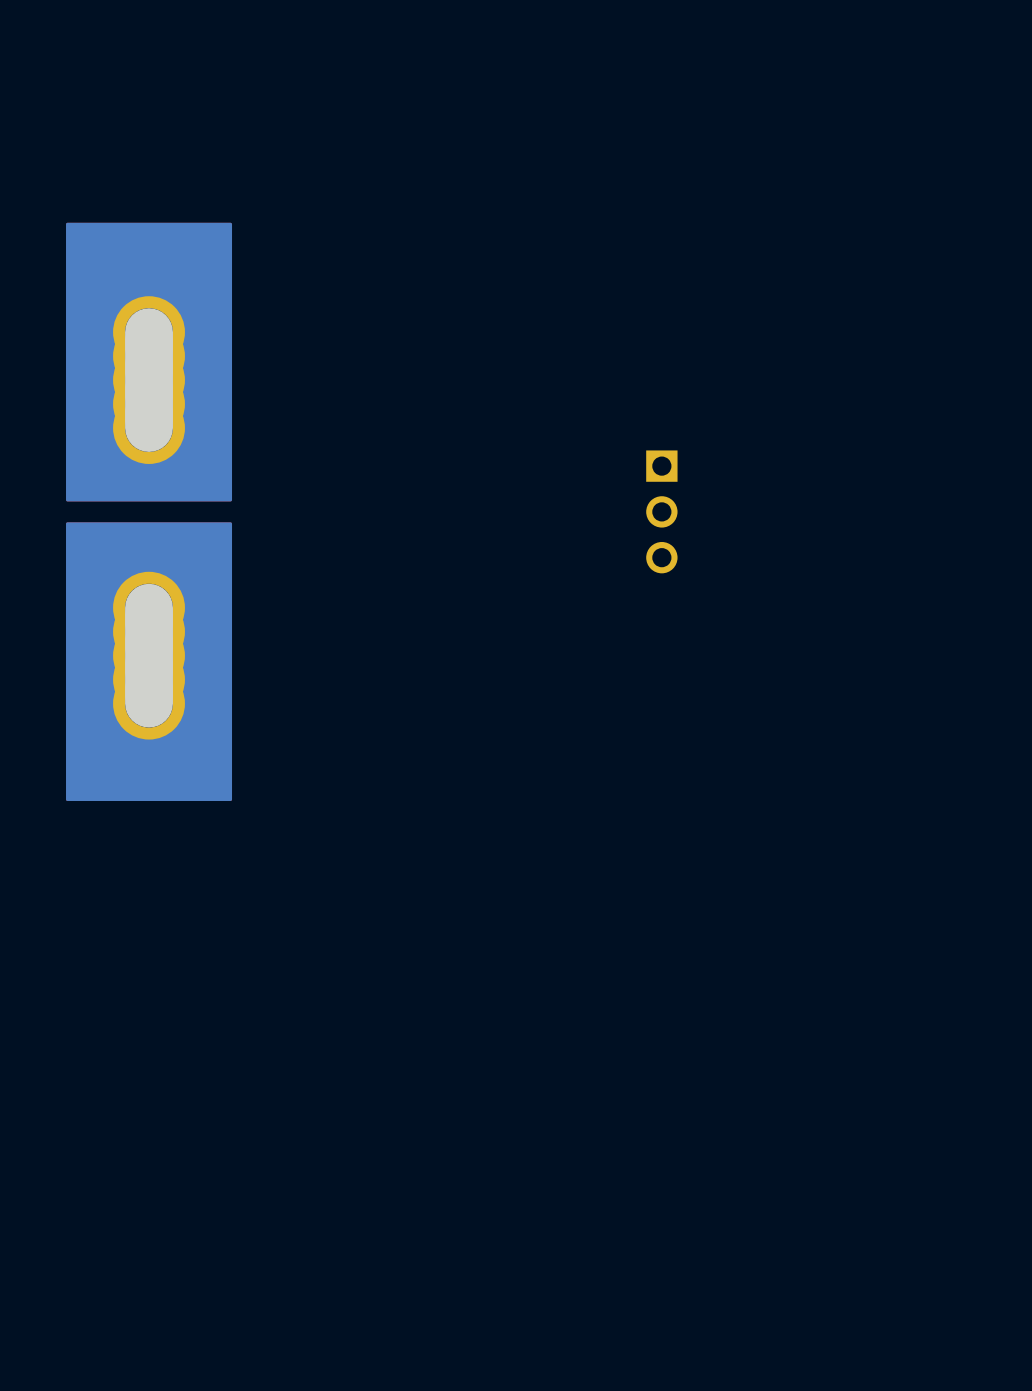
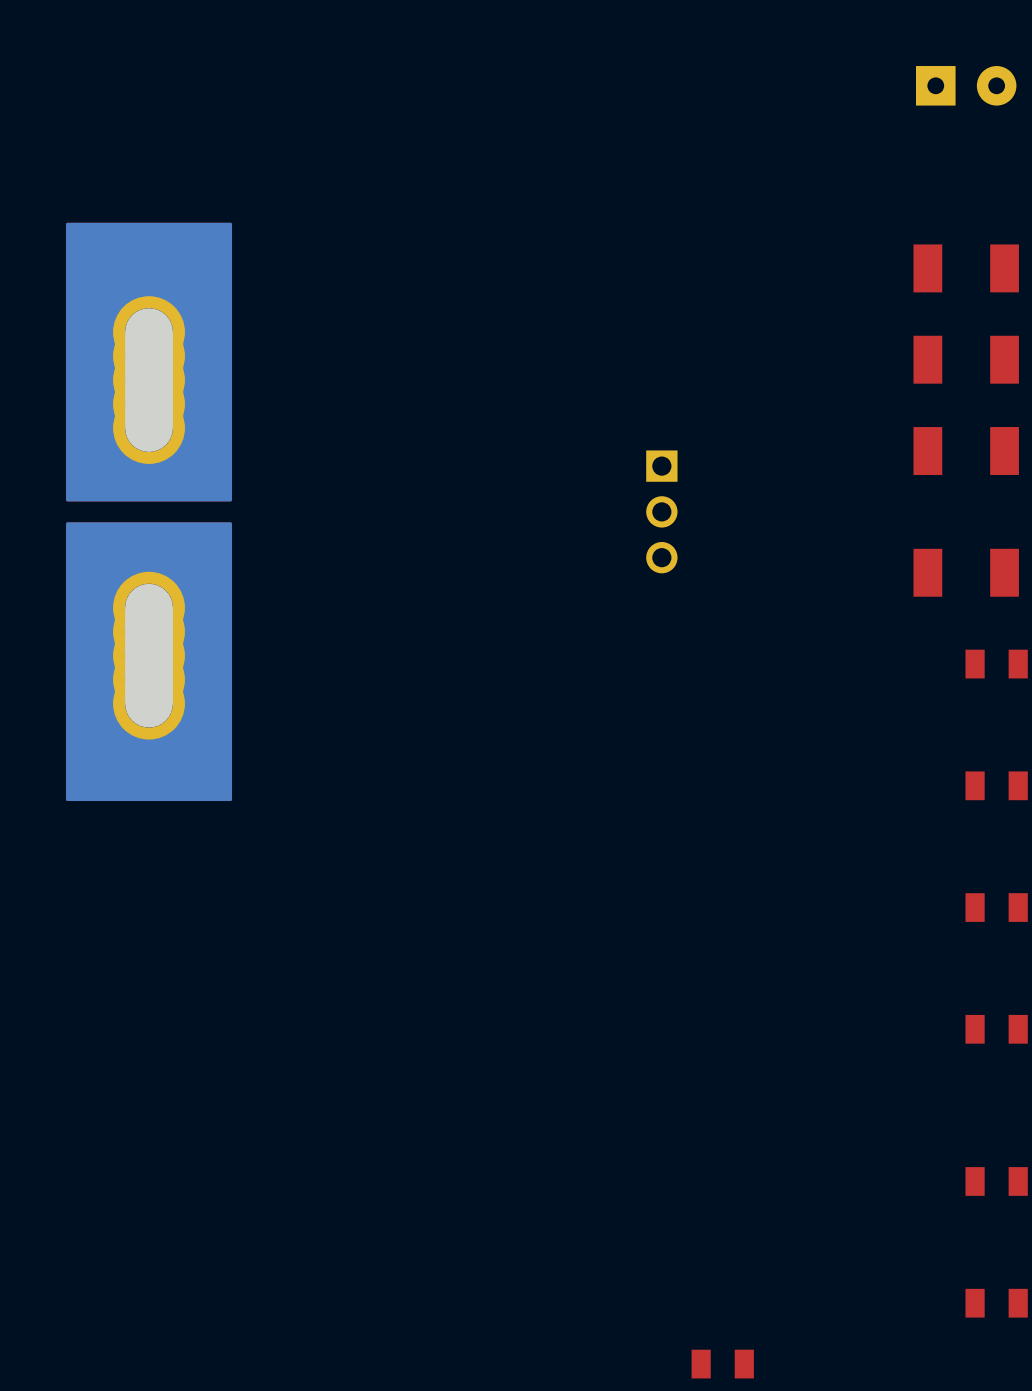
part: none -> (966, 85)
part: none -> (966, 268)
part: none -> (966, 359)
part: none -> (966, 451)
part: none -> (966, 572)
part: none -> (996, 664)
part: none -> (996, 785)
part: none -> (996, 907)
part: none -> (996, 1029)
part: none -> (996, 1181)
part: none -> (996, 1303)
part: none -> (722, 1364)

